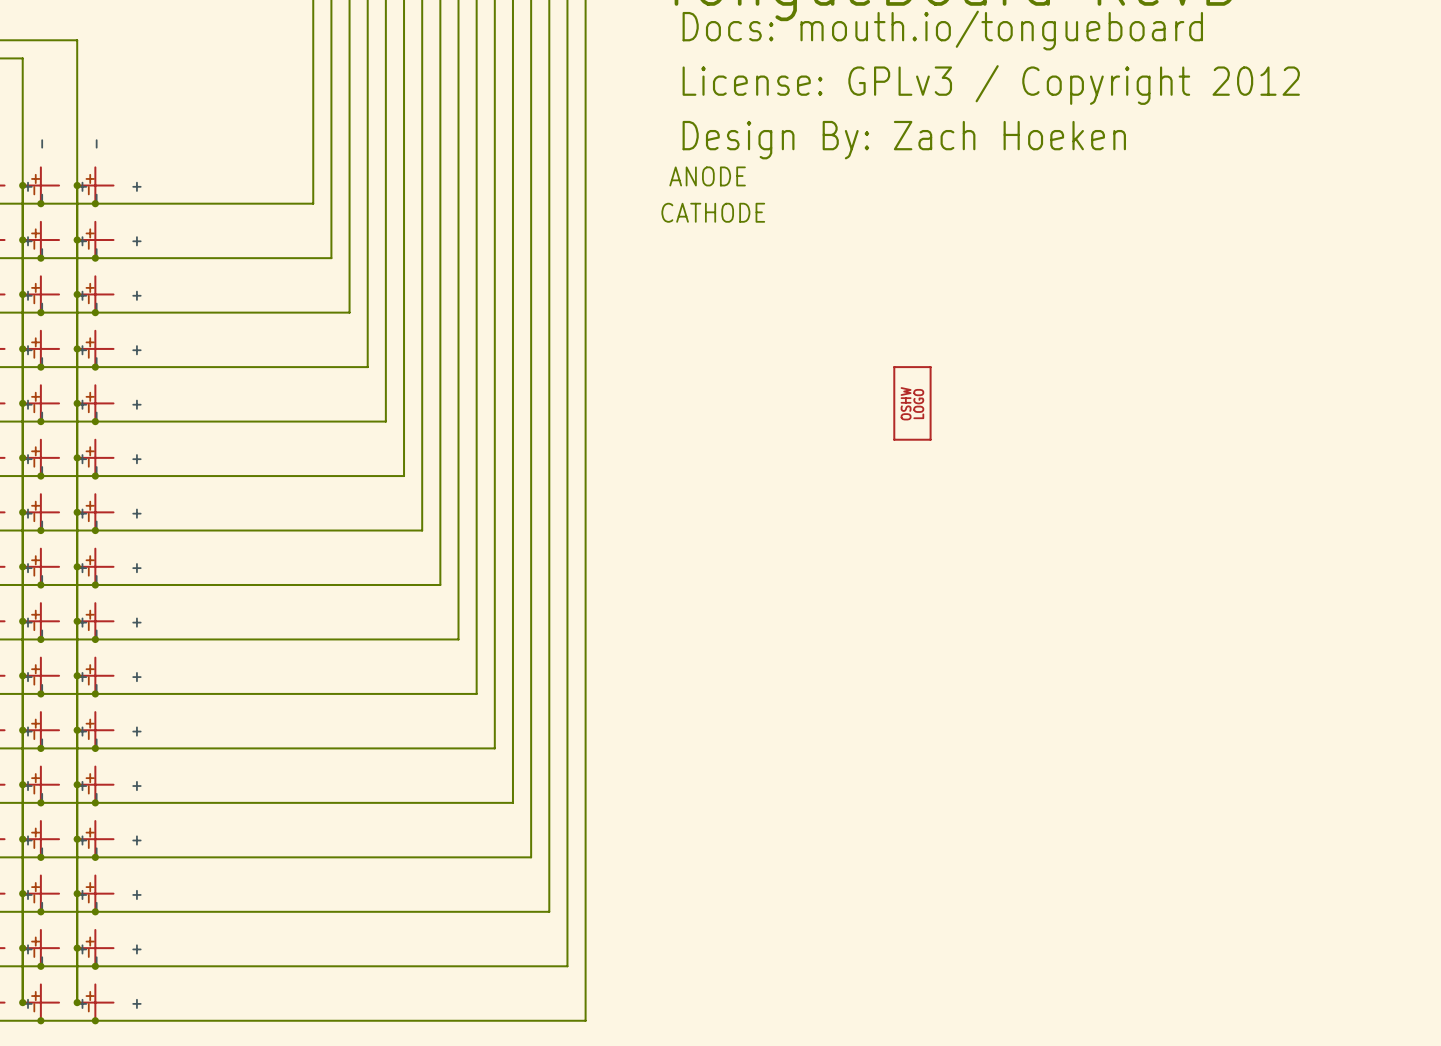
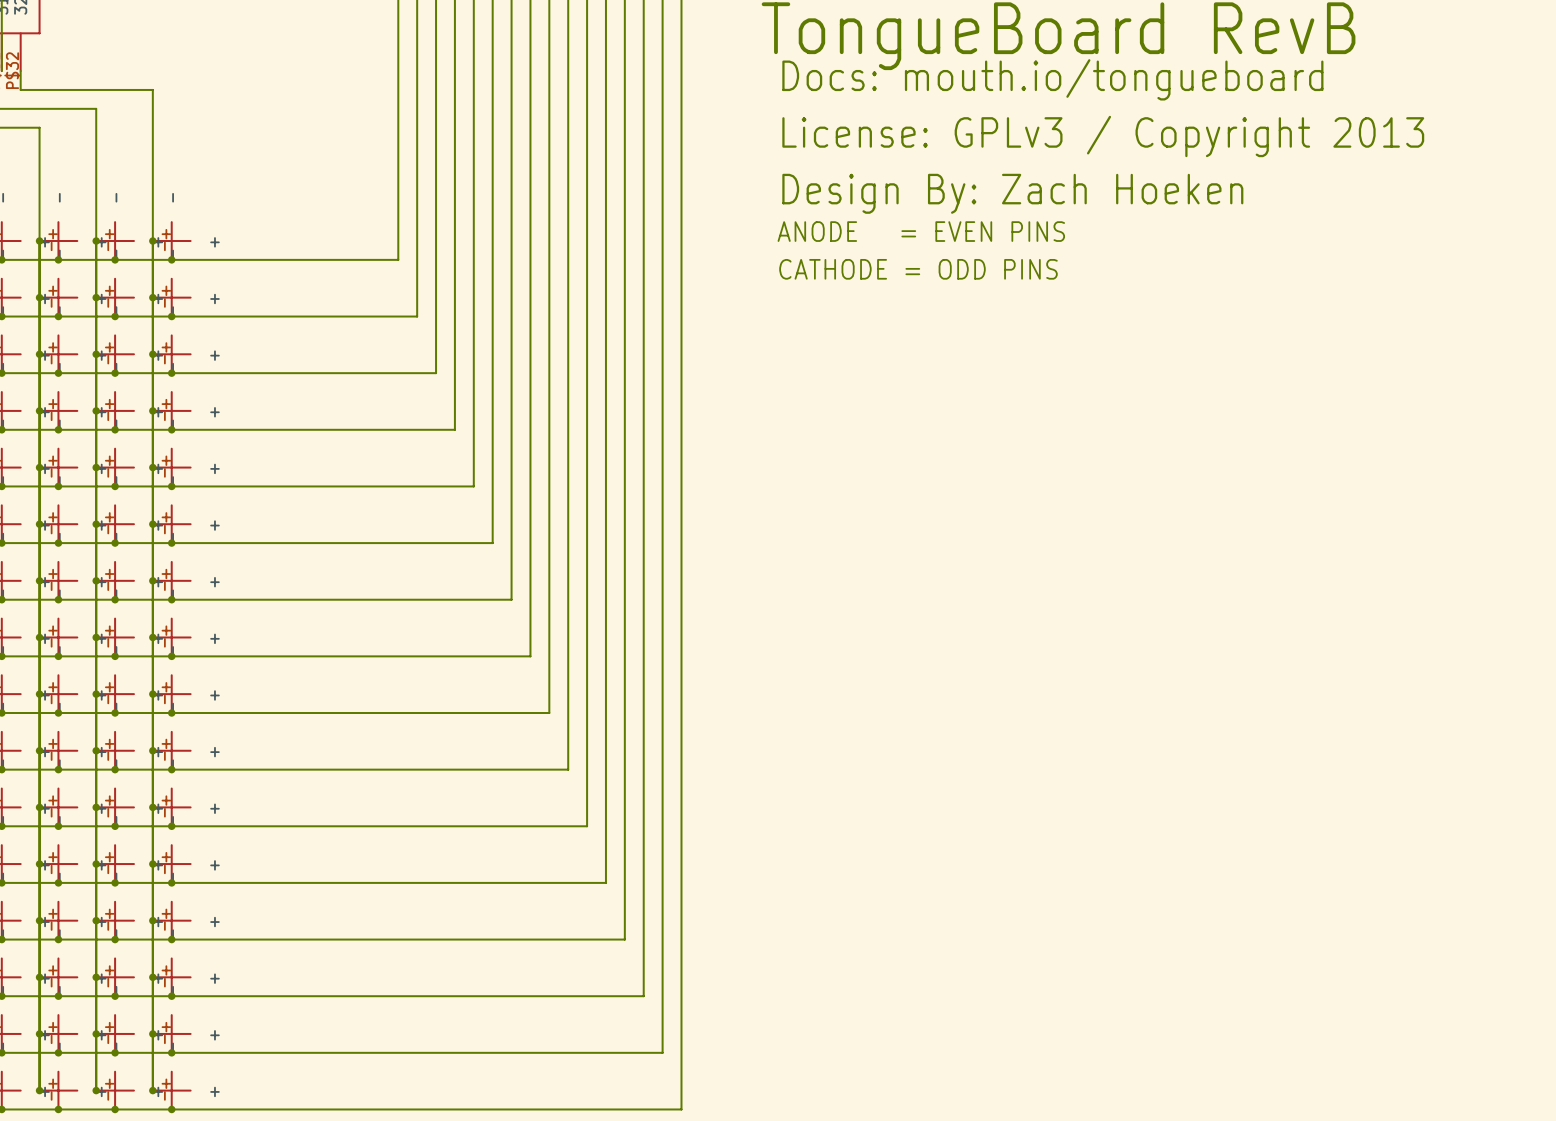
text: License: GPLv3 / Copyright 2012 (991, 85) -> License: GPLv3 / Copyright 2013 (1103, 136)
text: ANODE (707, 176) -> none
text: none -> ANODE = EVEN PINS (921, 231)
text: CATHODE (713, 212) -> none
text: none -> CATHODE = ODD PINS (918, 269)
part: (912, 403) -> none

